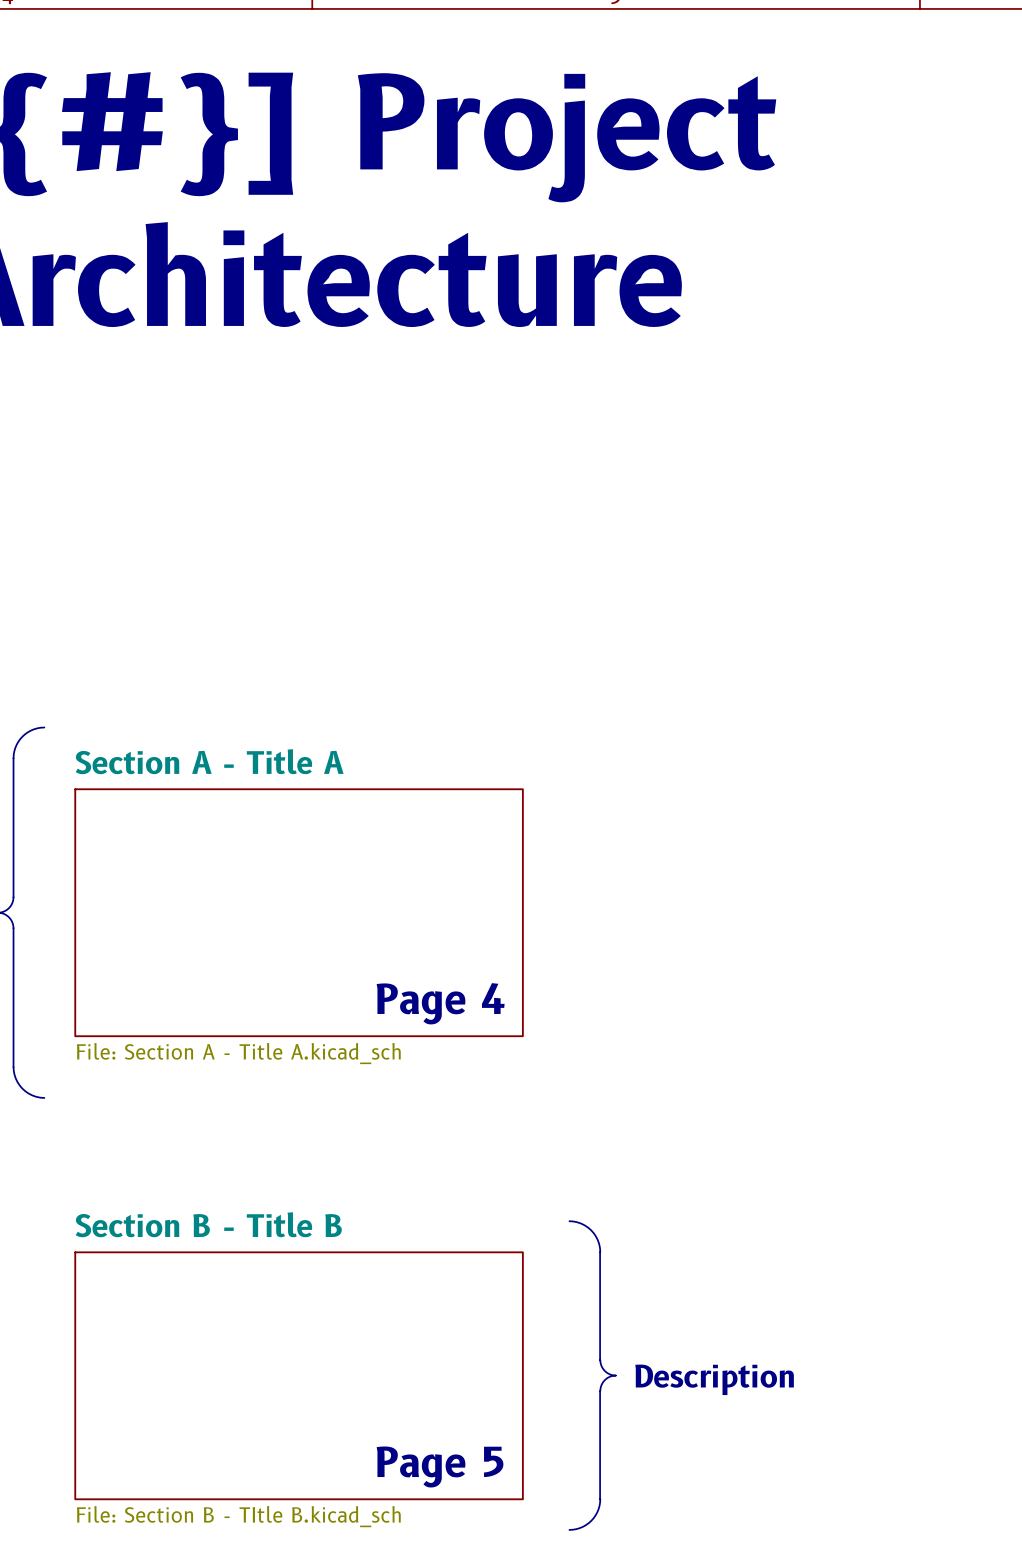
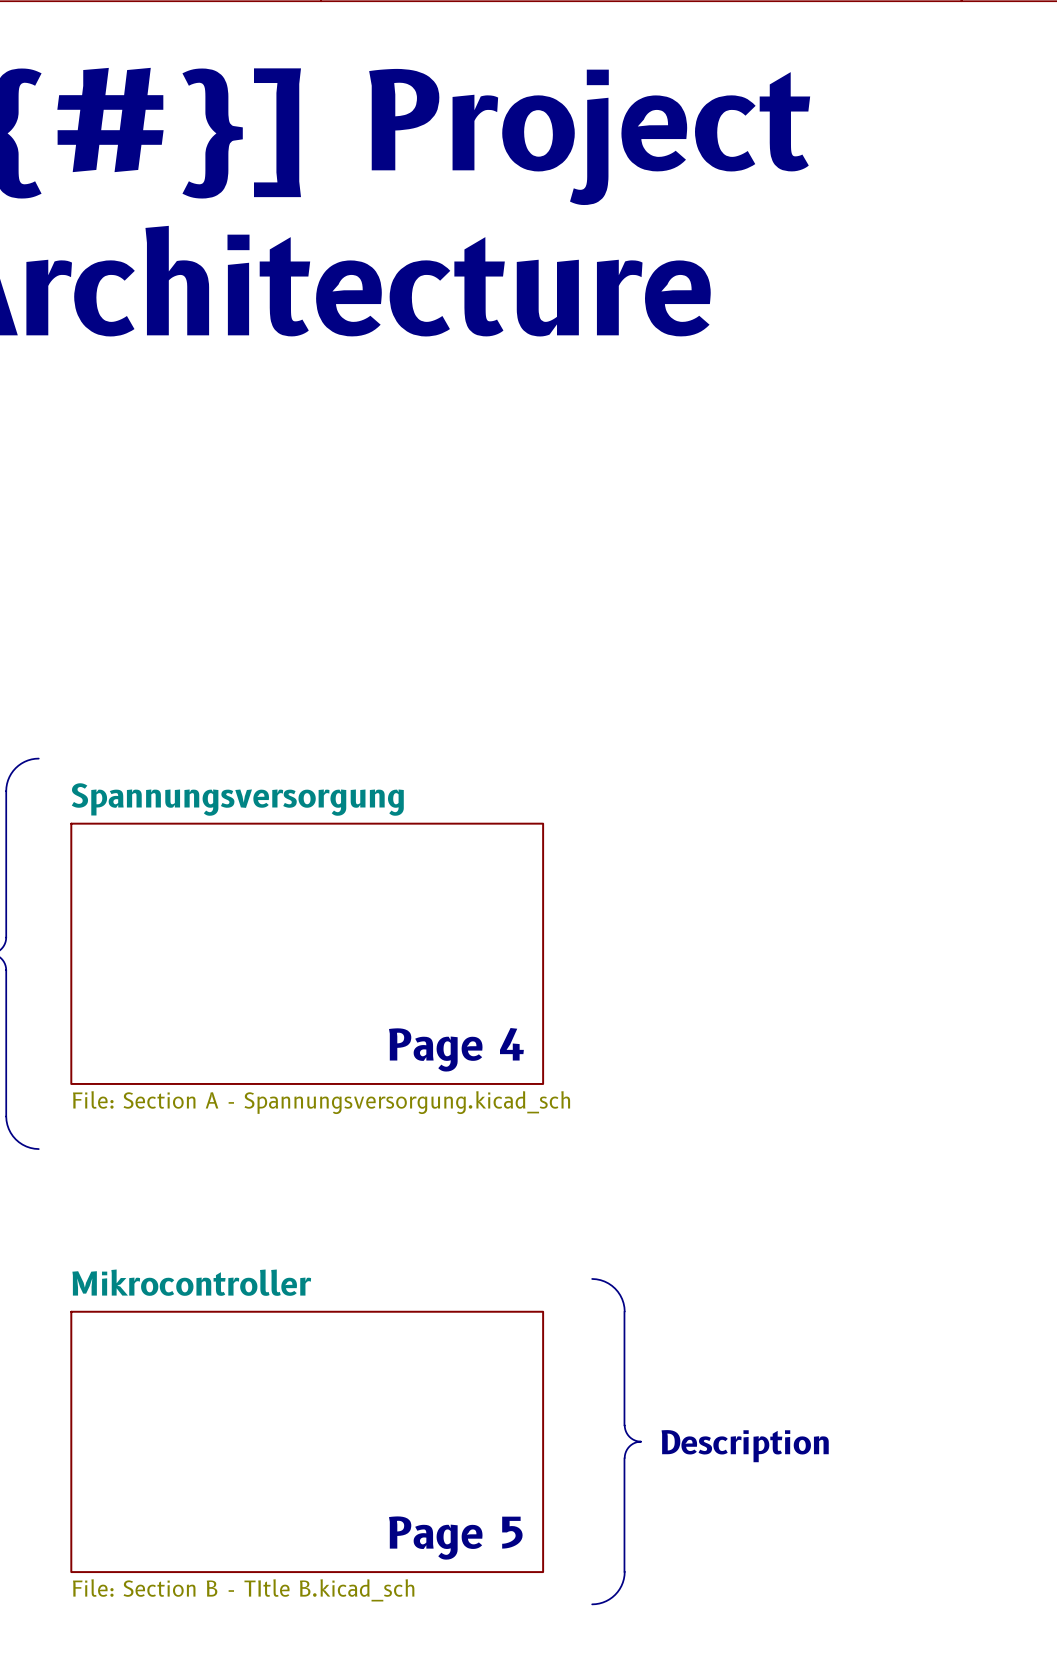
sheet Section A - Title A name: Section A - Title A (209, 761) -> Spannungsversorgung (237, 799)
sheet Section A - Title A value: File: Section A - Title A.kicad_sch (238, 1053) -> File: Section A - Spannungsversorgung.kicad_sch (321, 1102)
sheet Section B - Title B name: Section B - Title B (208, 1224) -> Mikrocontroller (191, 1282)

